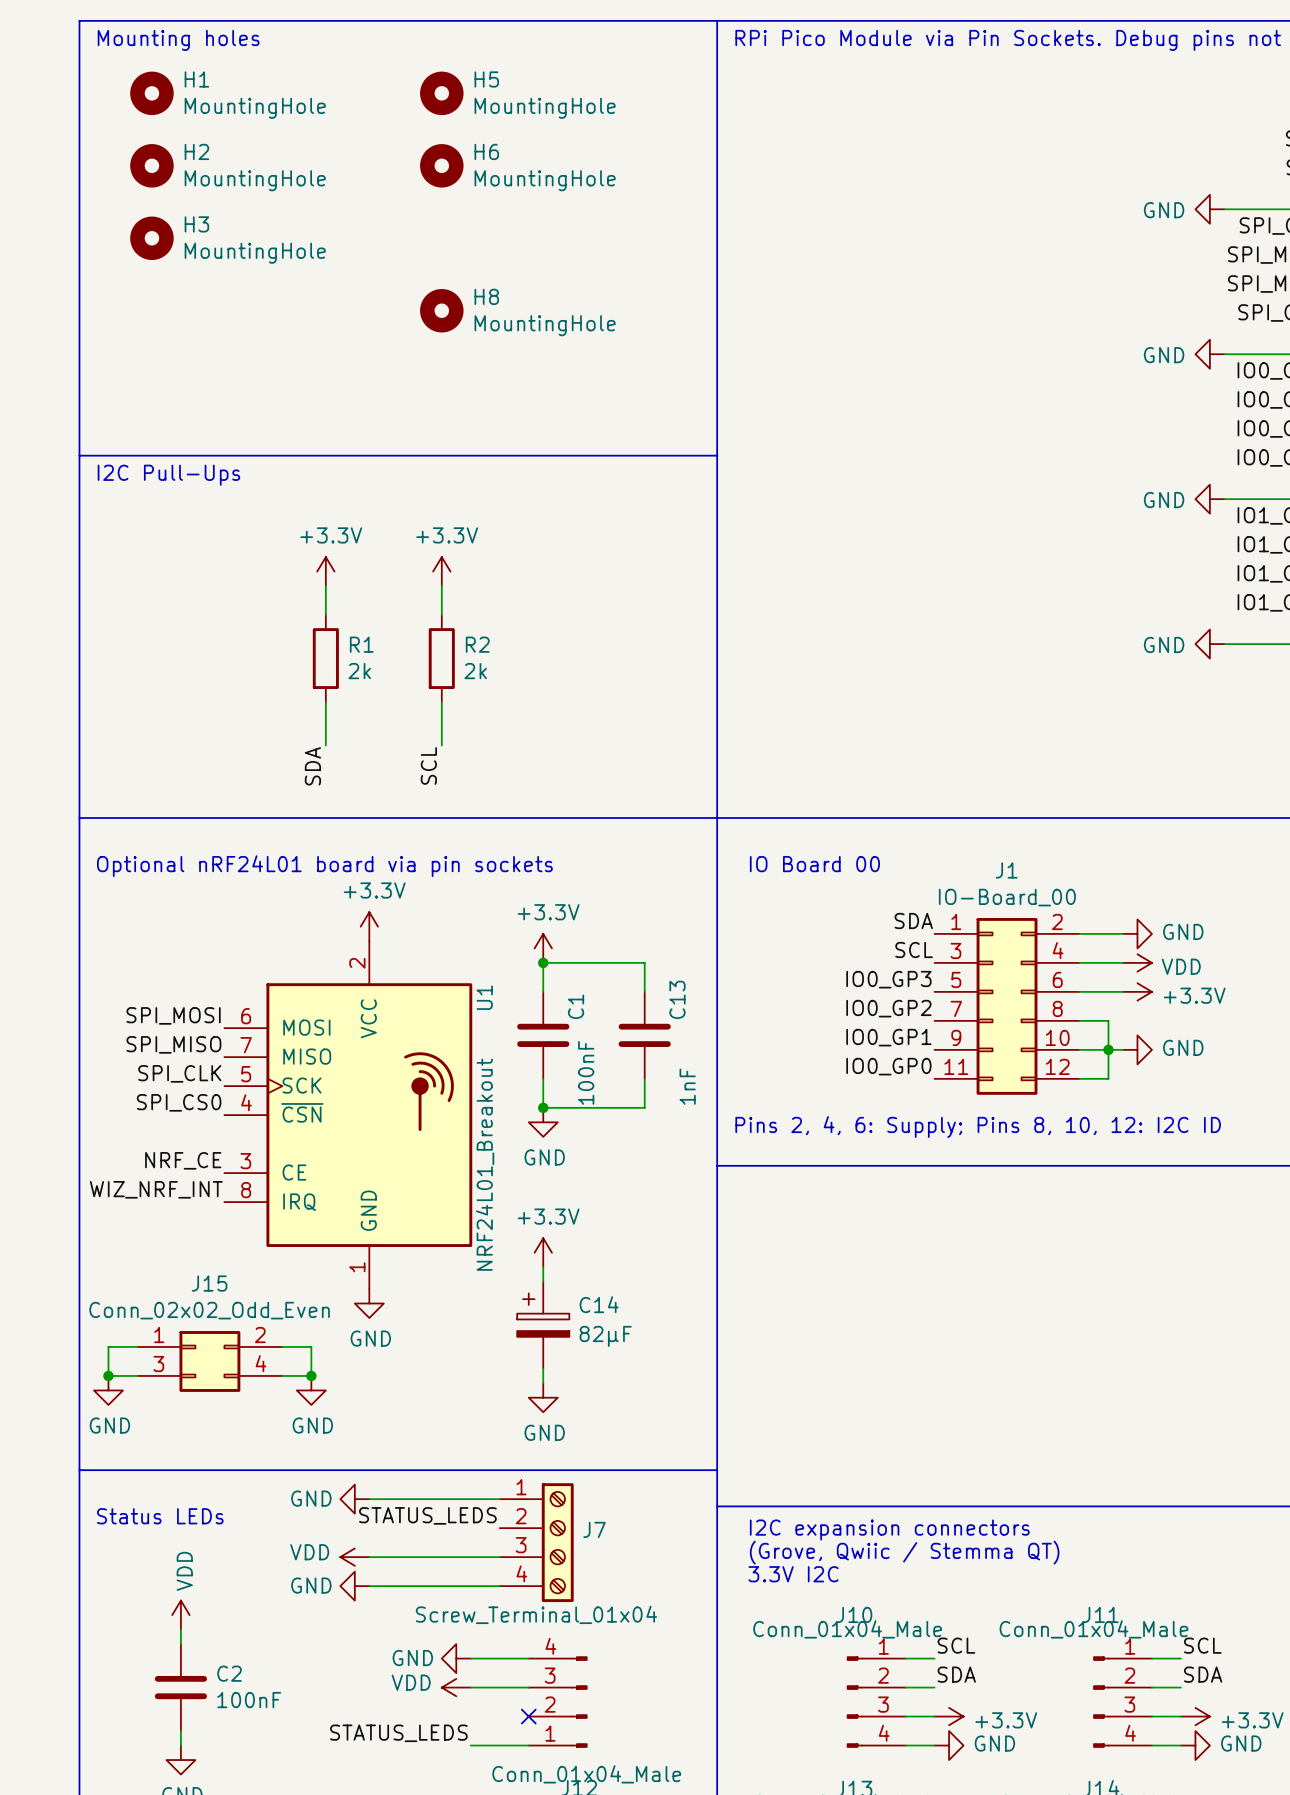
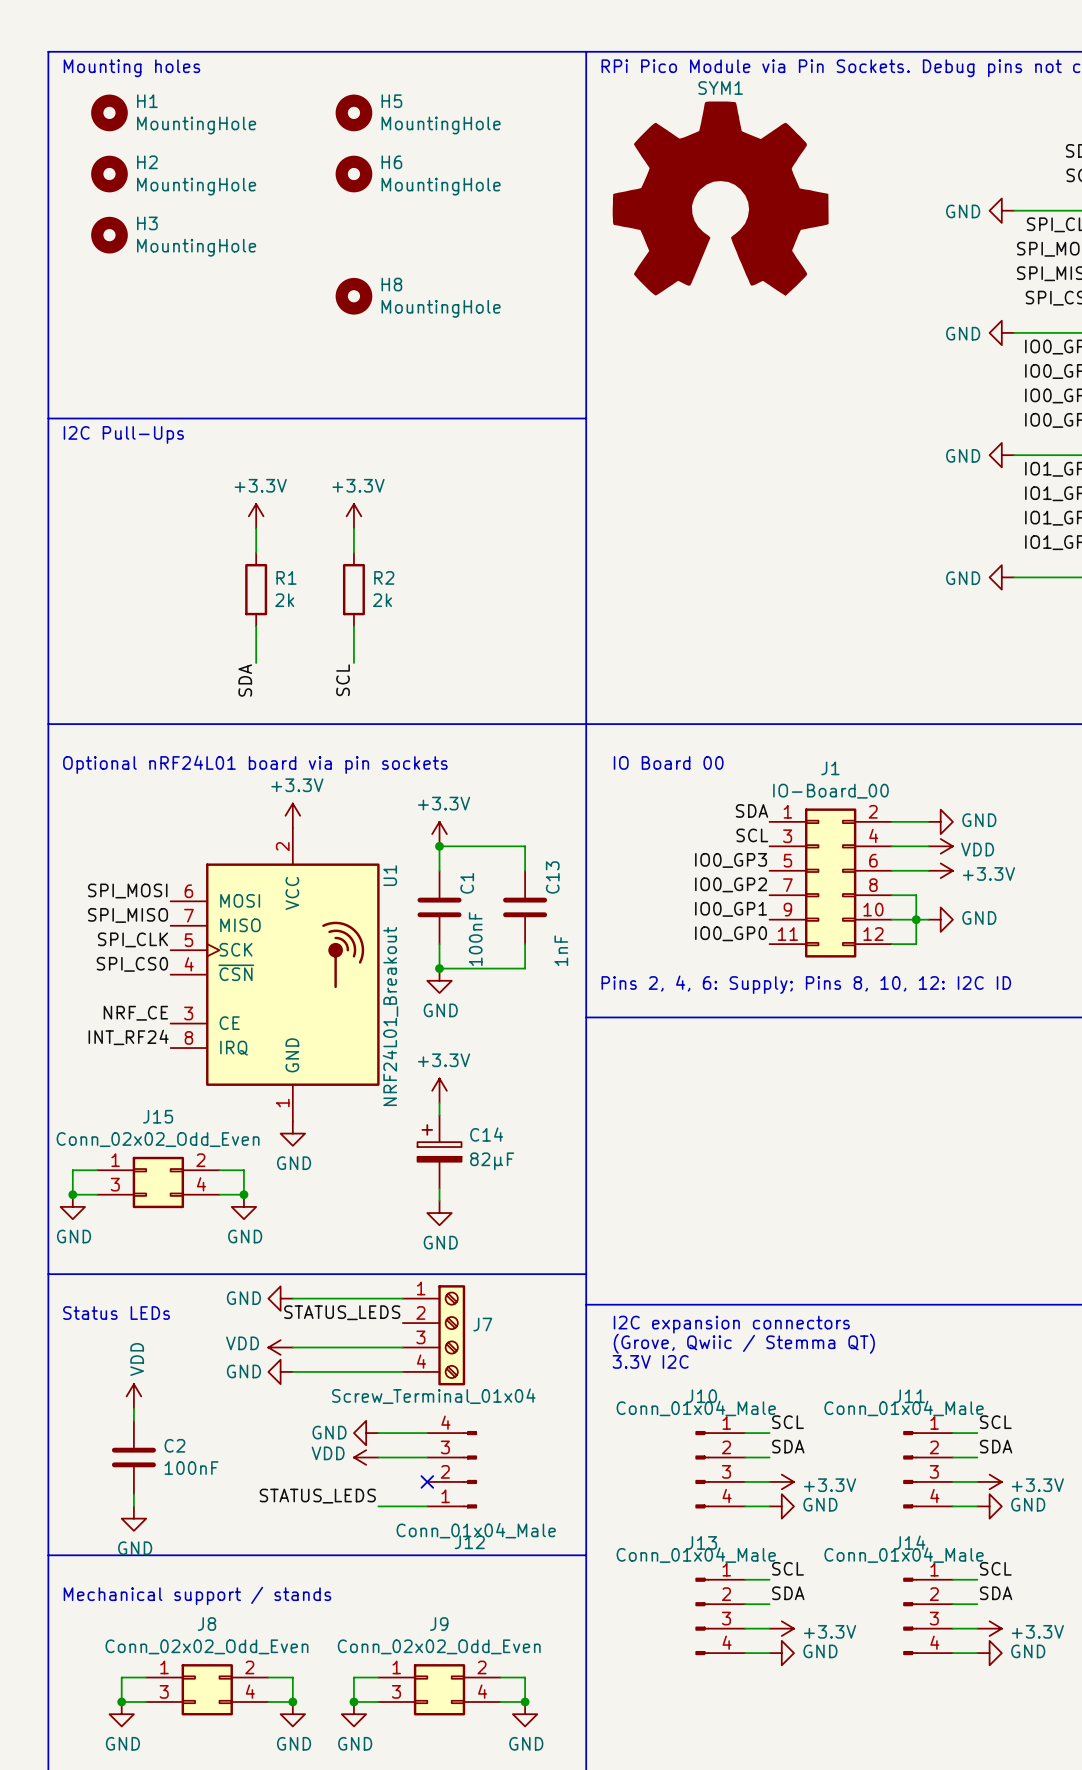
SYM1: none -> (720, 198)
label: WIZ_NRF_INT (156, 1189) -> INT_RF24 (128, 1037)

